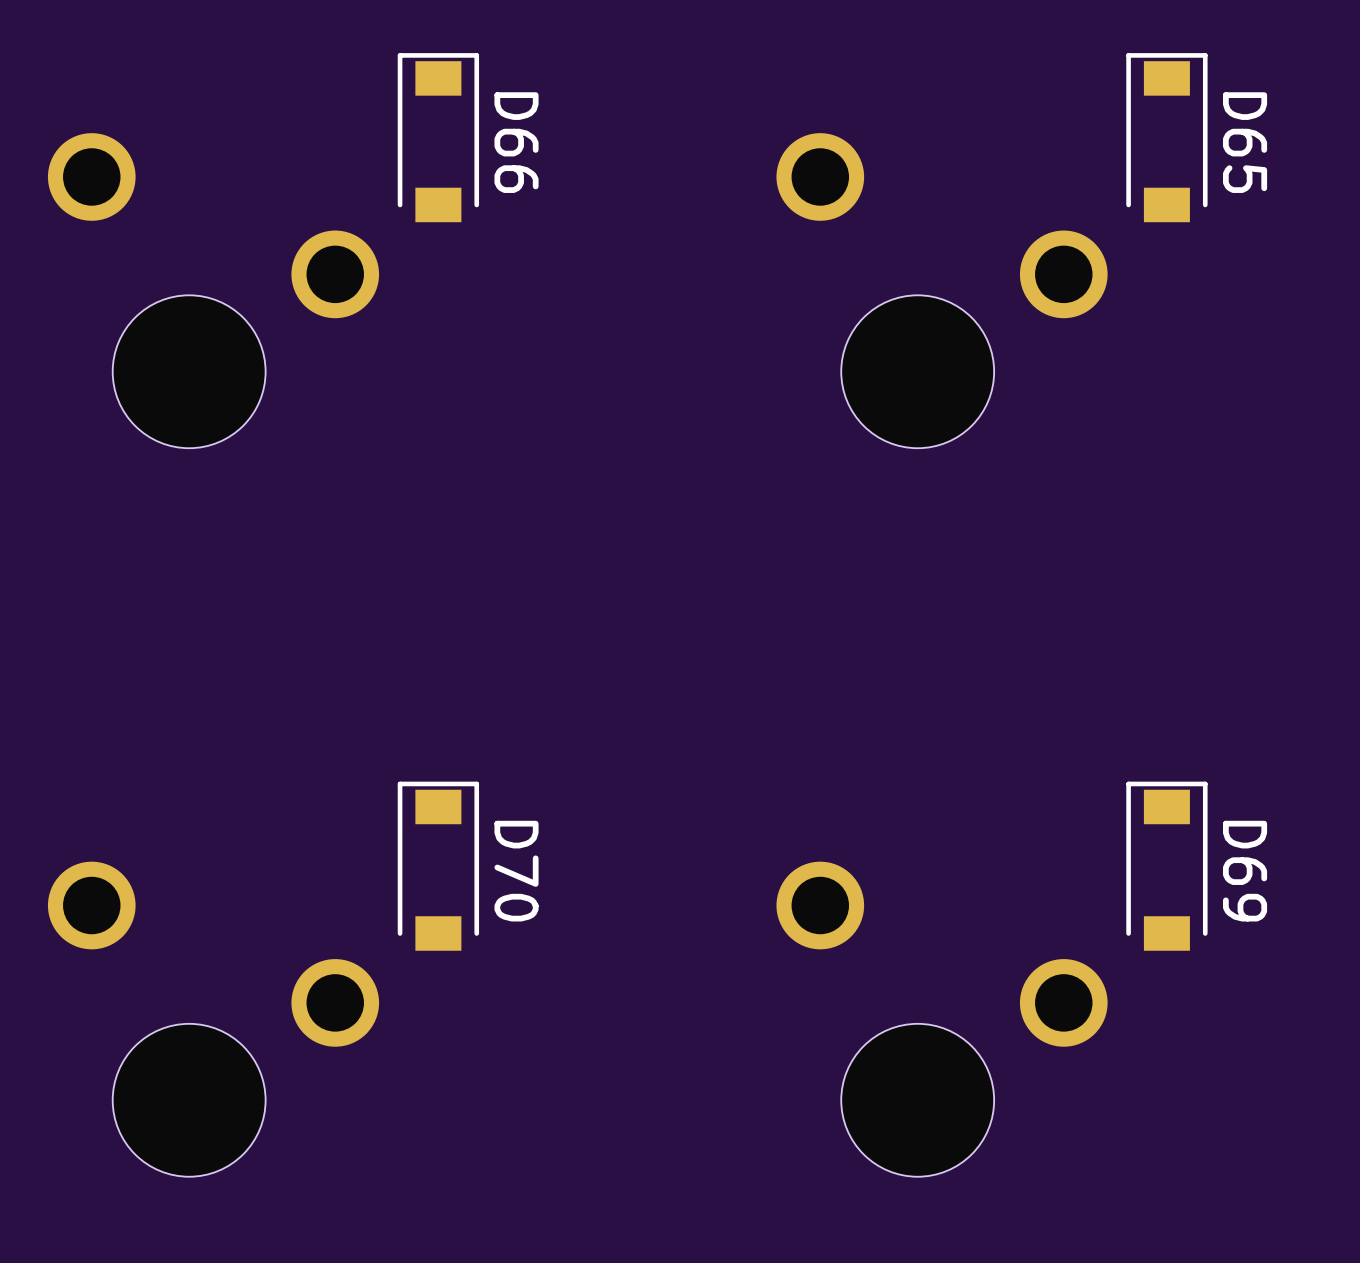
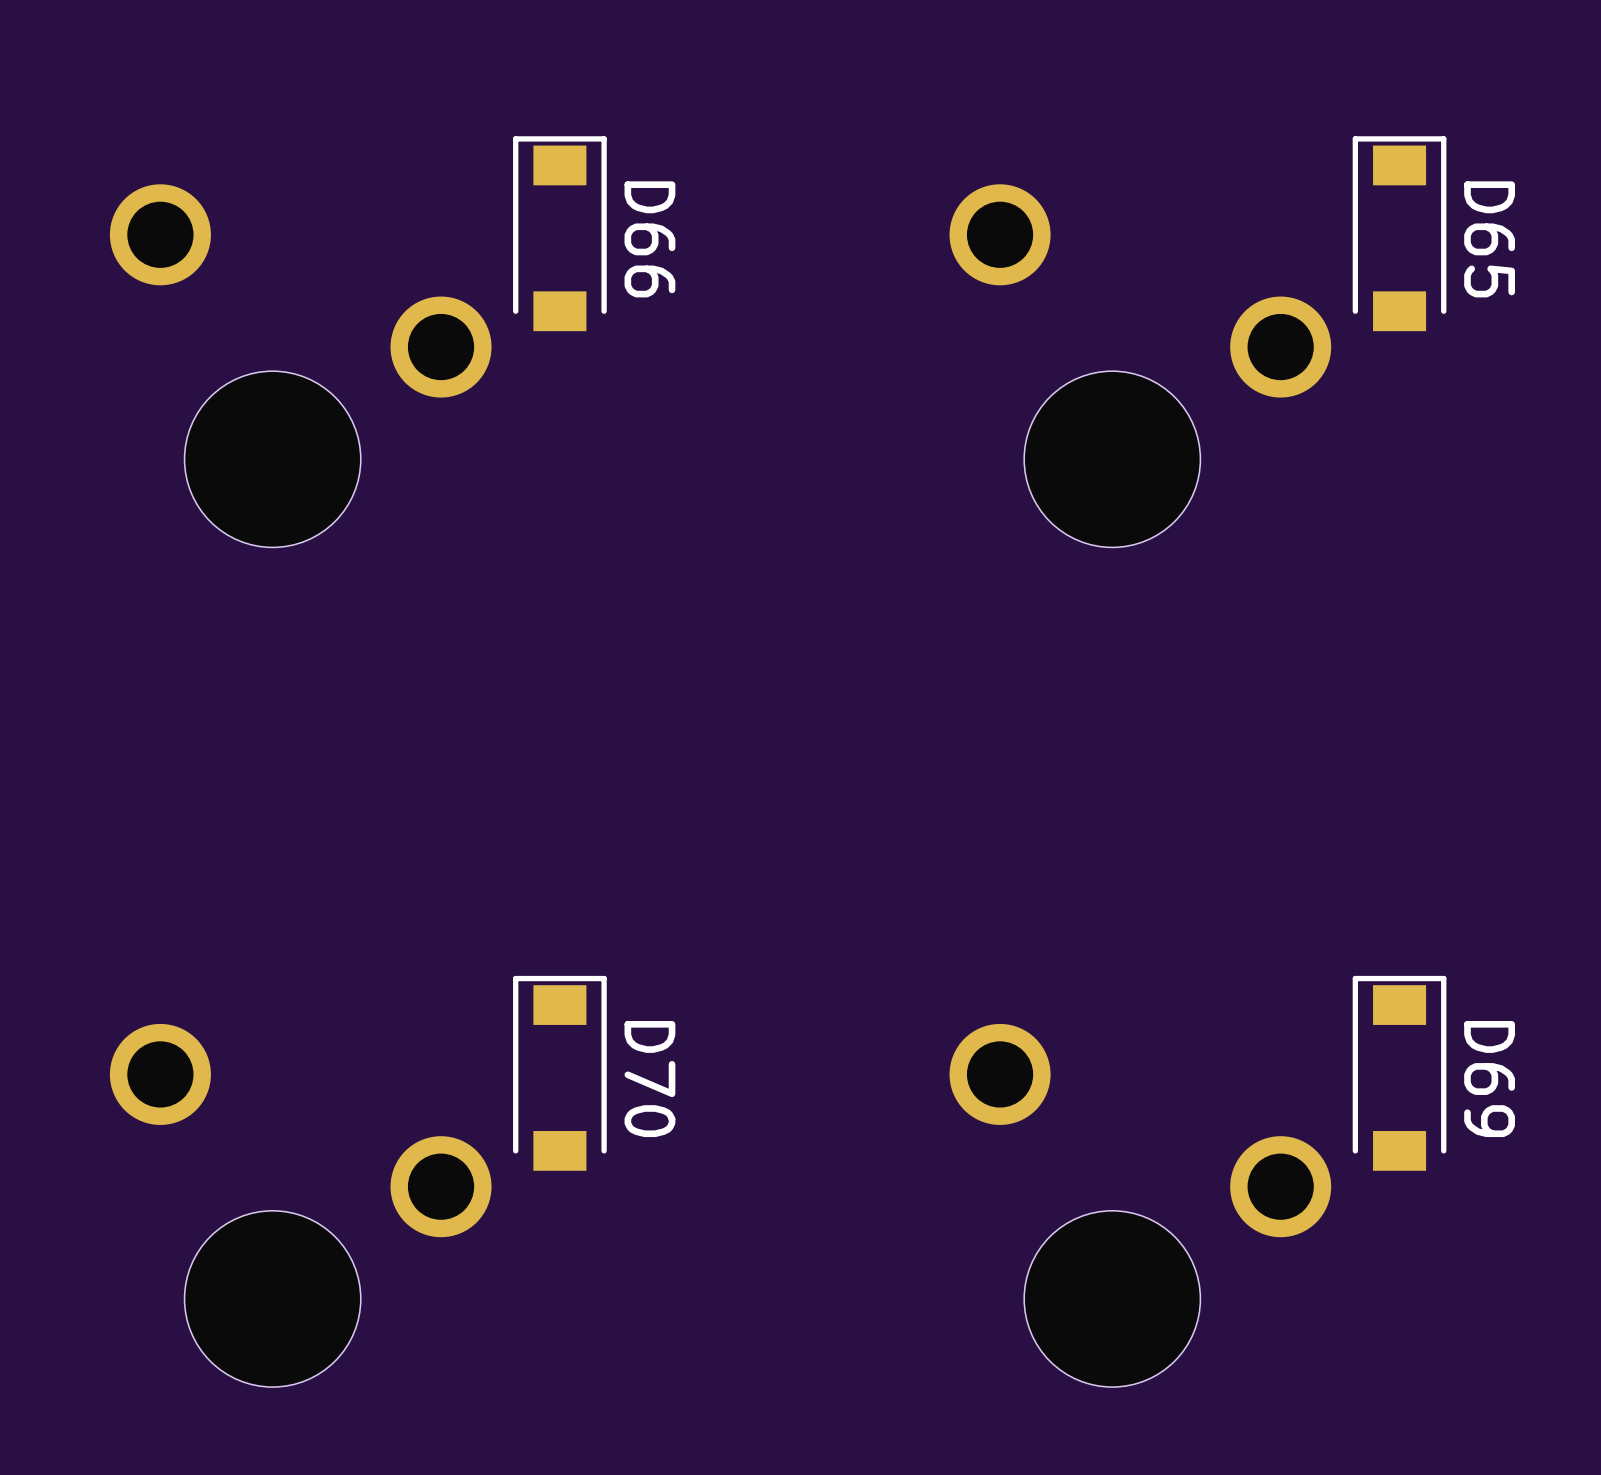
D66 position: (438, 137) -> (559, 233)
D65 position: (1166, 137) -> (1399, 233)
D70 position: (438, 866) -> (559, 1073)
D69 position: (1166, 866) -> (1399, 1073)

